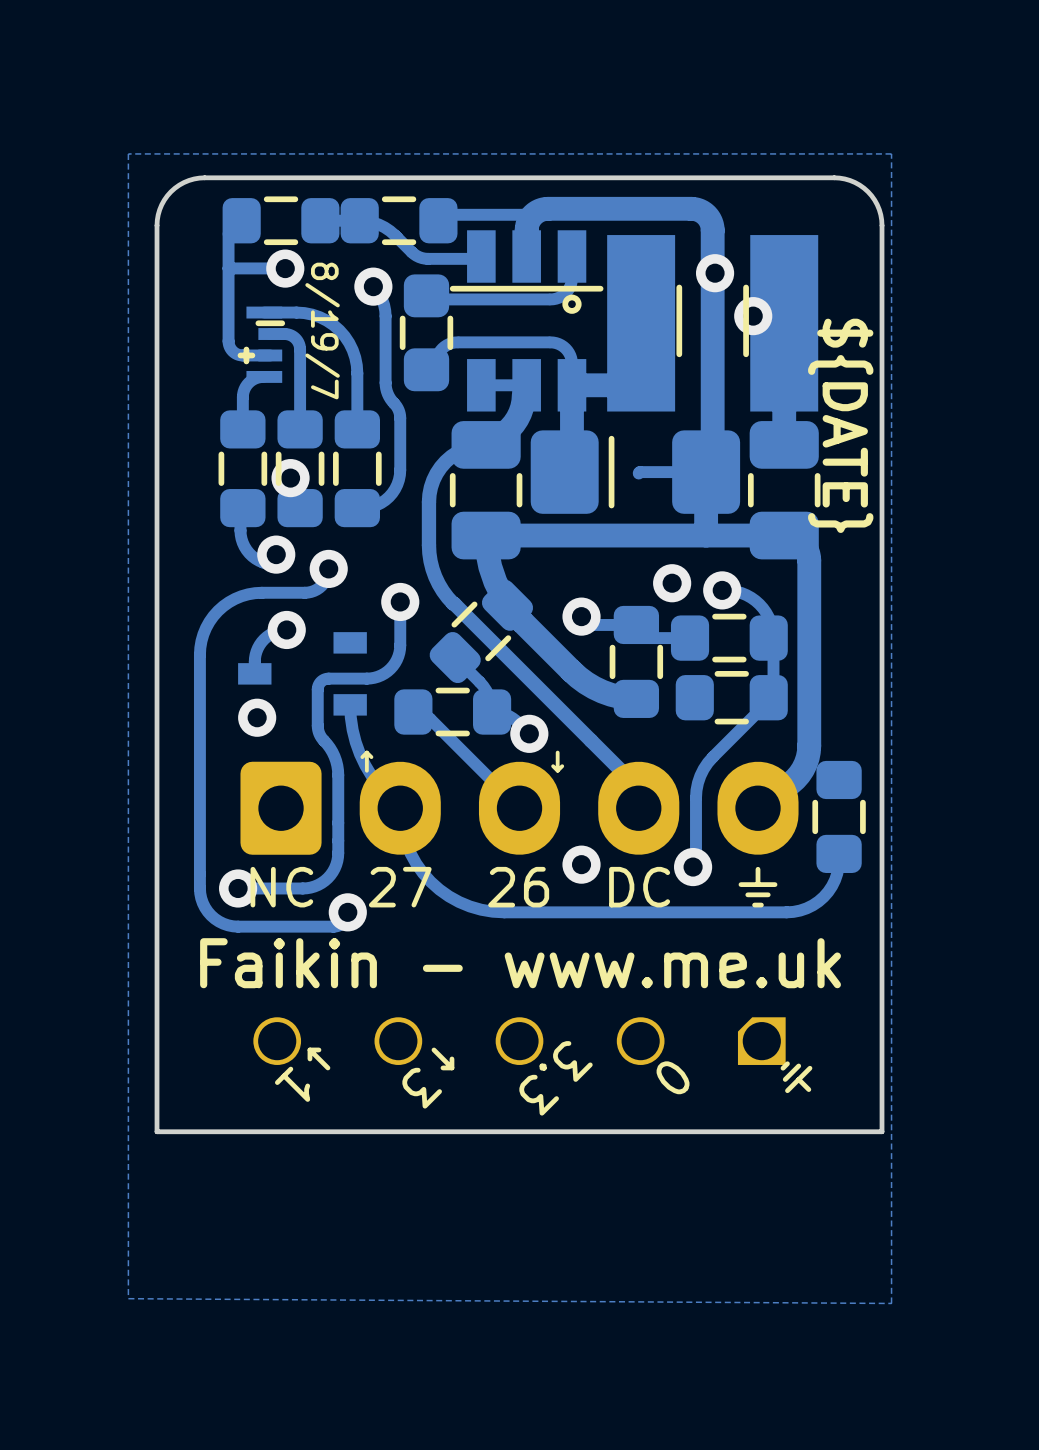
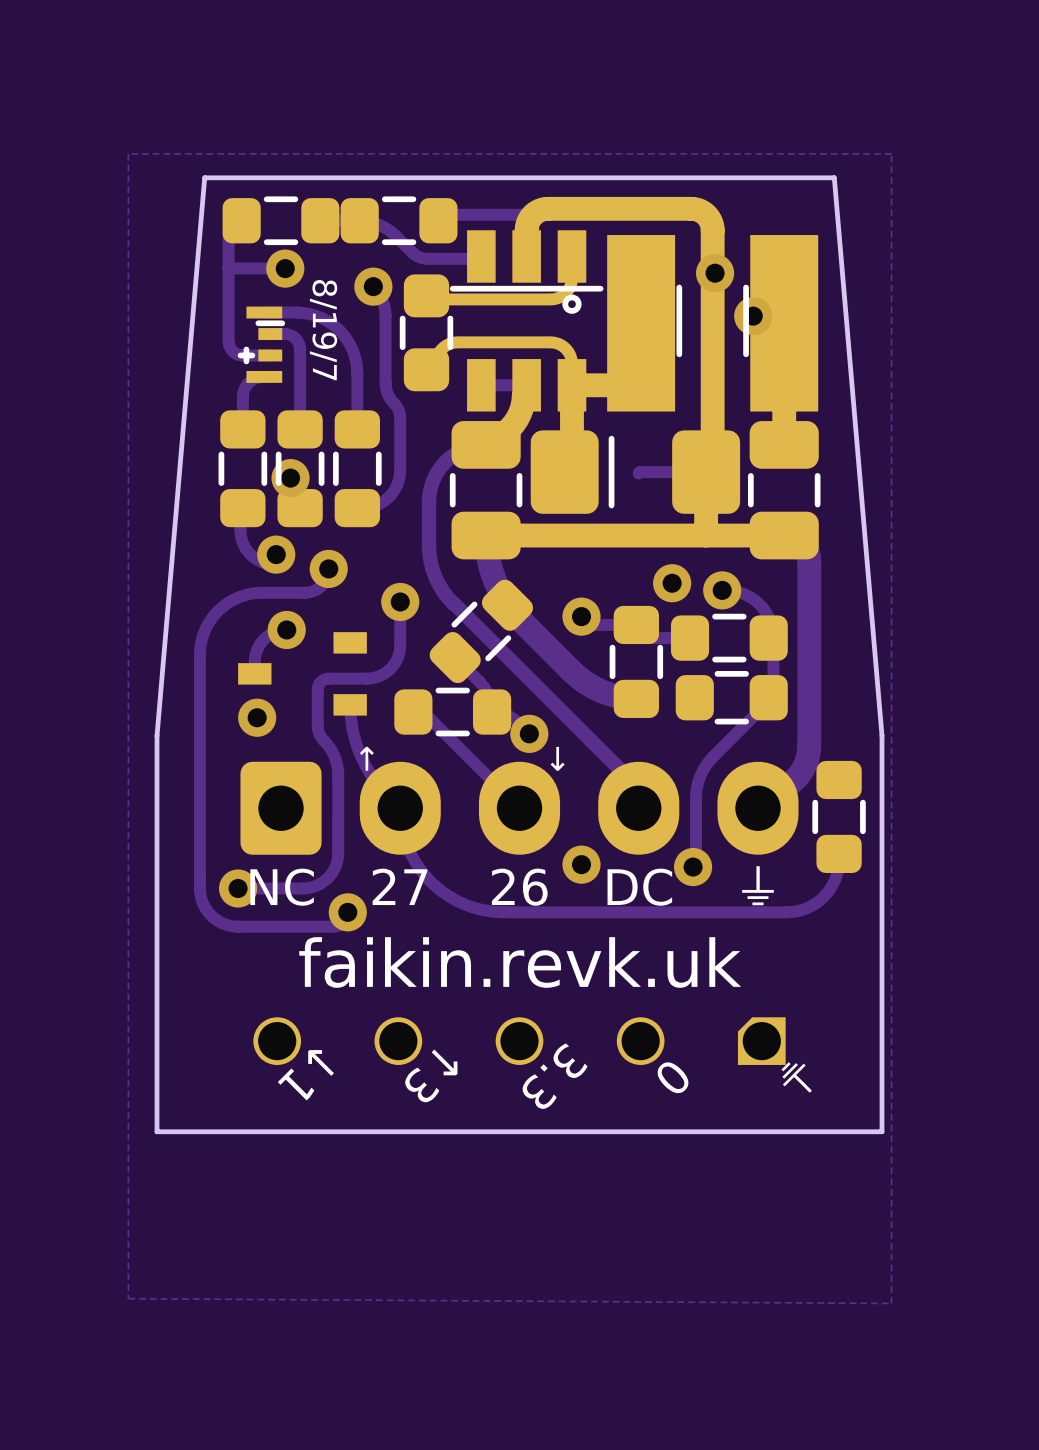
board edge: (204, 177) (184, 182) (170, 191) (161, 204) (157, 220) (157, 735) -> (204, 177) (157, 735)
board edge: (834, 177) (855, 182) (868, 191) (877, 204) (881, 220) (882, 735) -> (834, 177) (882, 735)
text: ${DATE} (840, 425) -> none
text: Faikin - www.me.uk (520, 963) -> faikin.revk.uk (520, 962)

